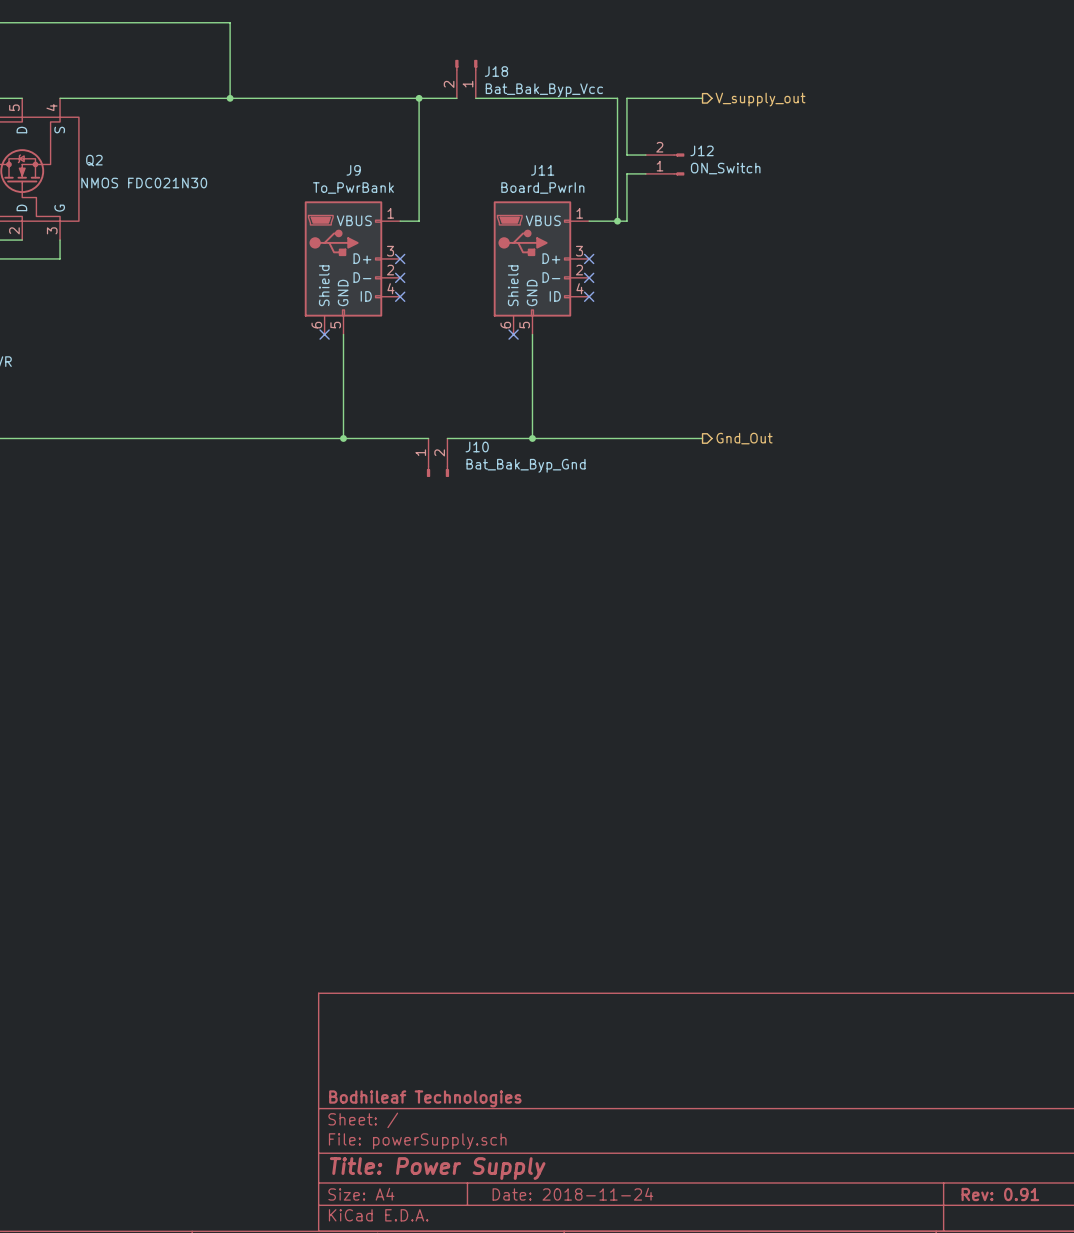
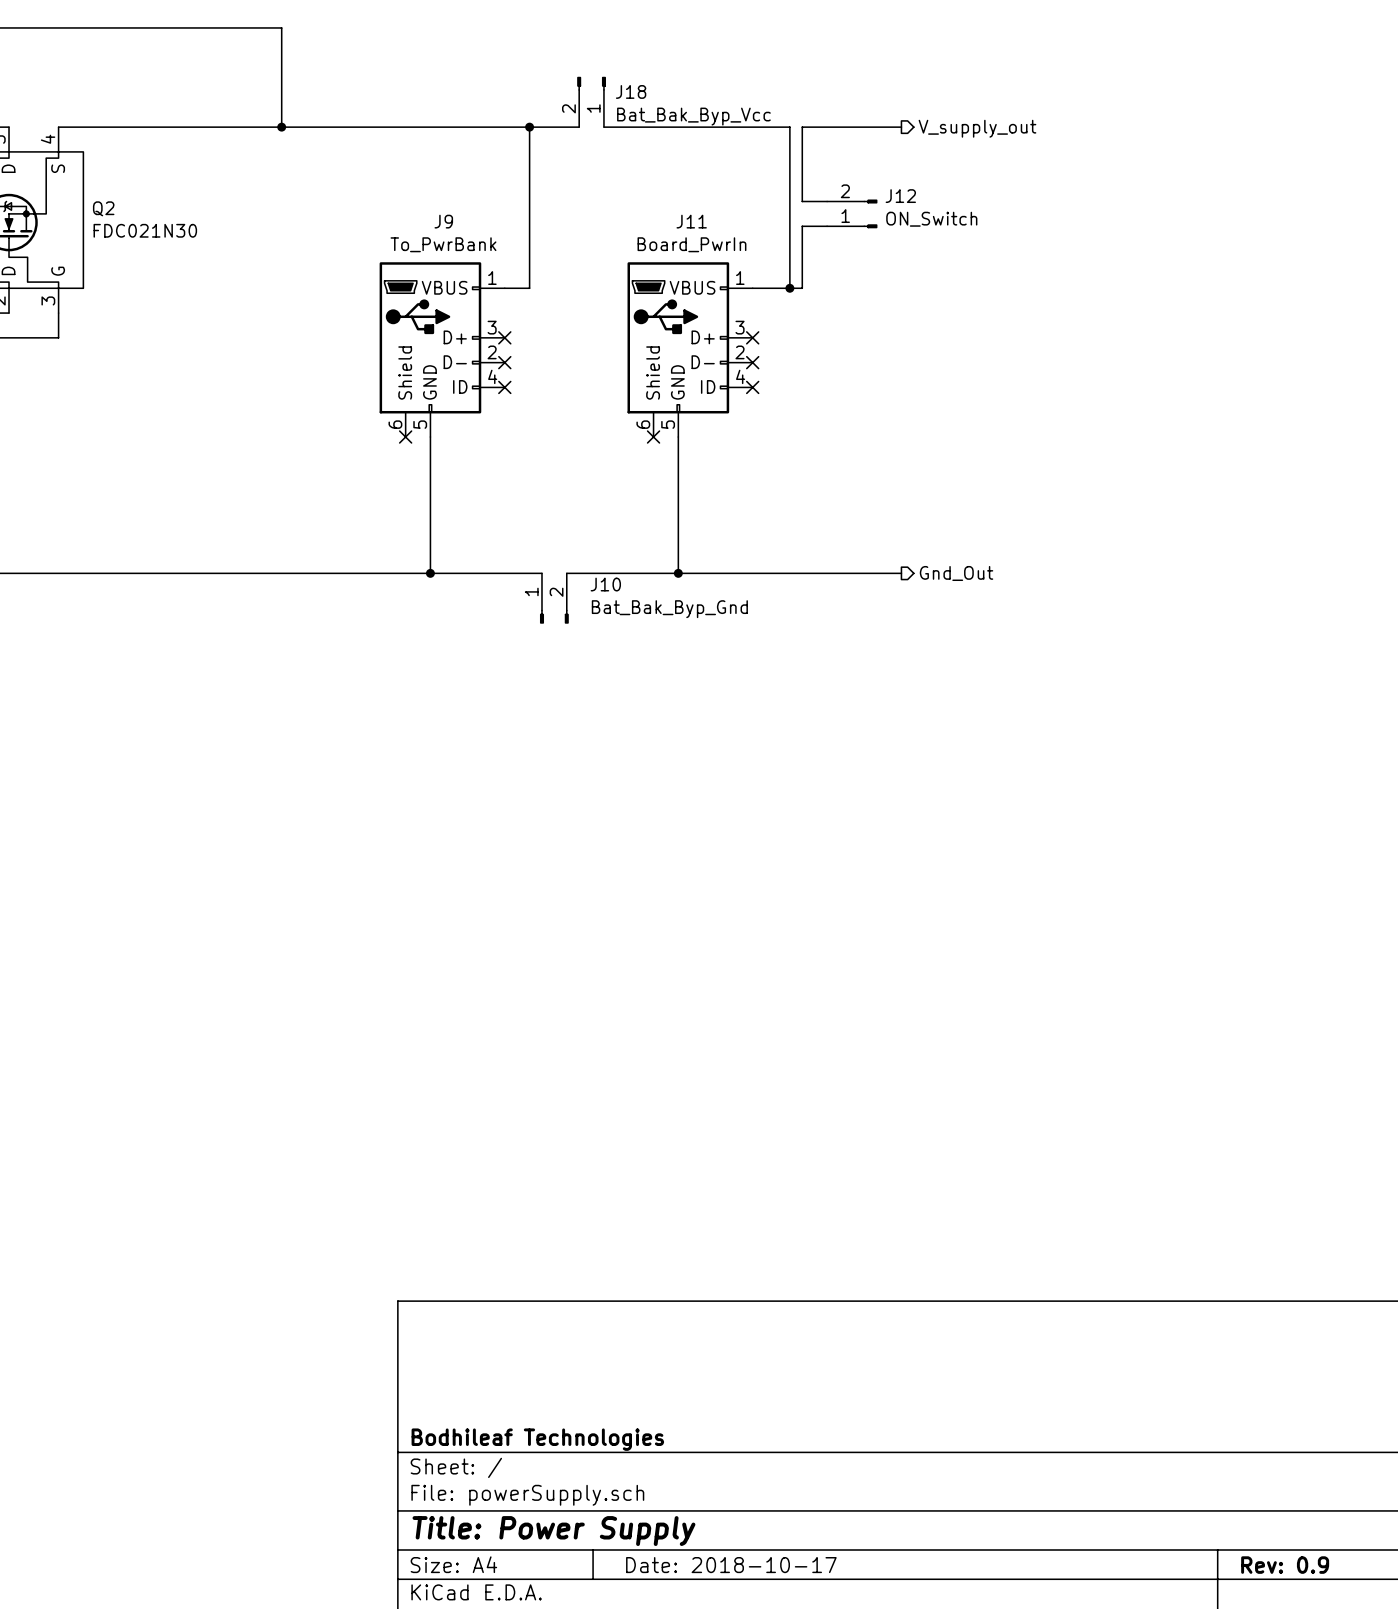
Q2 value: NMOS FDC021N30 (144, 183) -> FDC021N30 (145, 230)
title block: Date: 2018-11-24 (572, 1194) -> Date: 2018-10-17 (731, 1565)
title block: Rev: 0.91 (1000, 1194) -> Rev: 0.9 (1285, 1565)

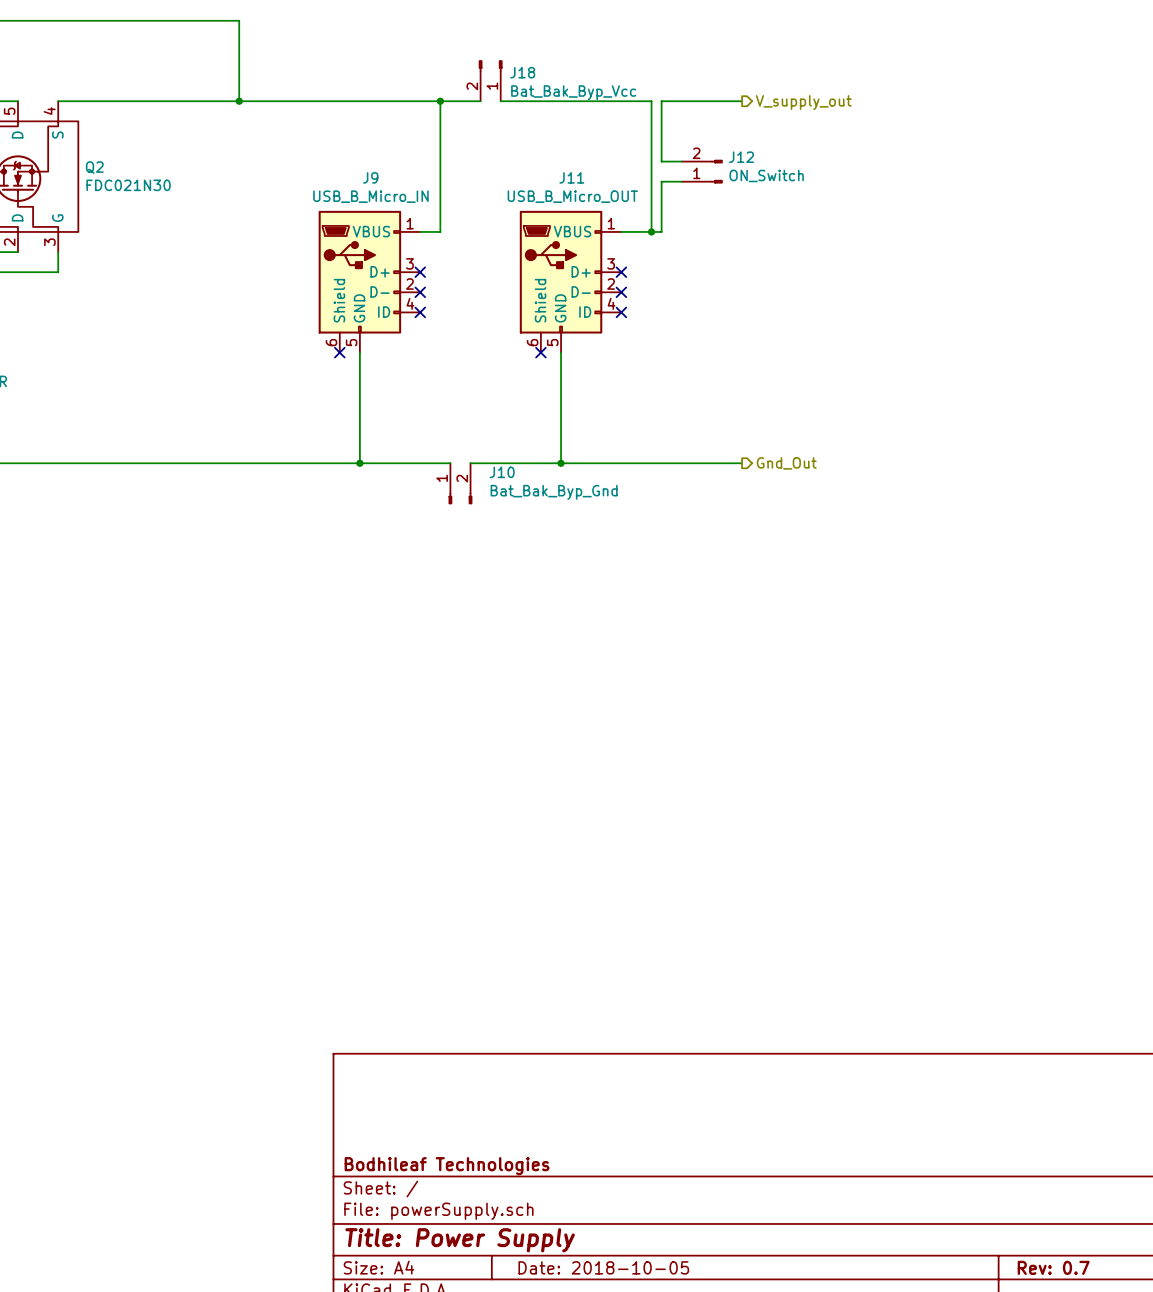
J9 value: To_PwrBank (443, 244) -> USB_B_Micro_IN (370, 196)
J11 value: Board_PwrIn (691, 244) -> USB_B_Micro_OUT (572, 196)
title block: Date: 2018-10-17 (731, 1565) -> Date: 2018-10-05 (603, 1267)
title block: Rev: 0.9 (1285, 1565) -> Rev: 0.7 (1053, 1267)

